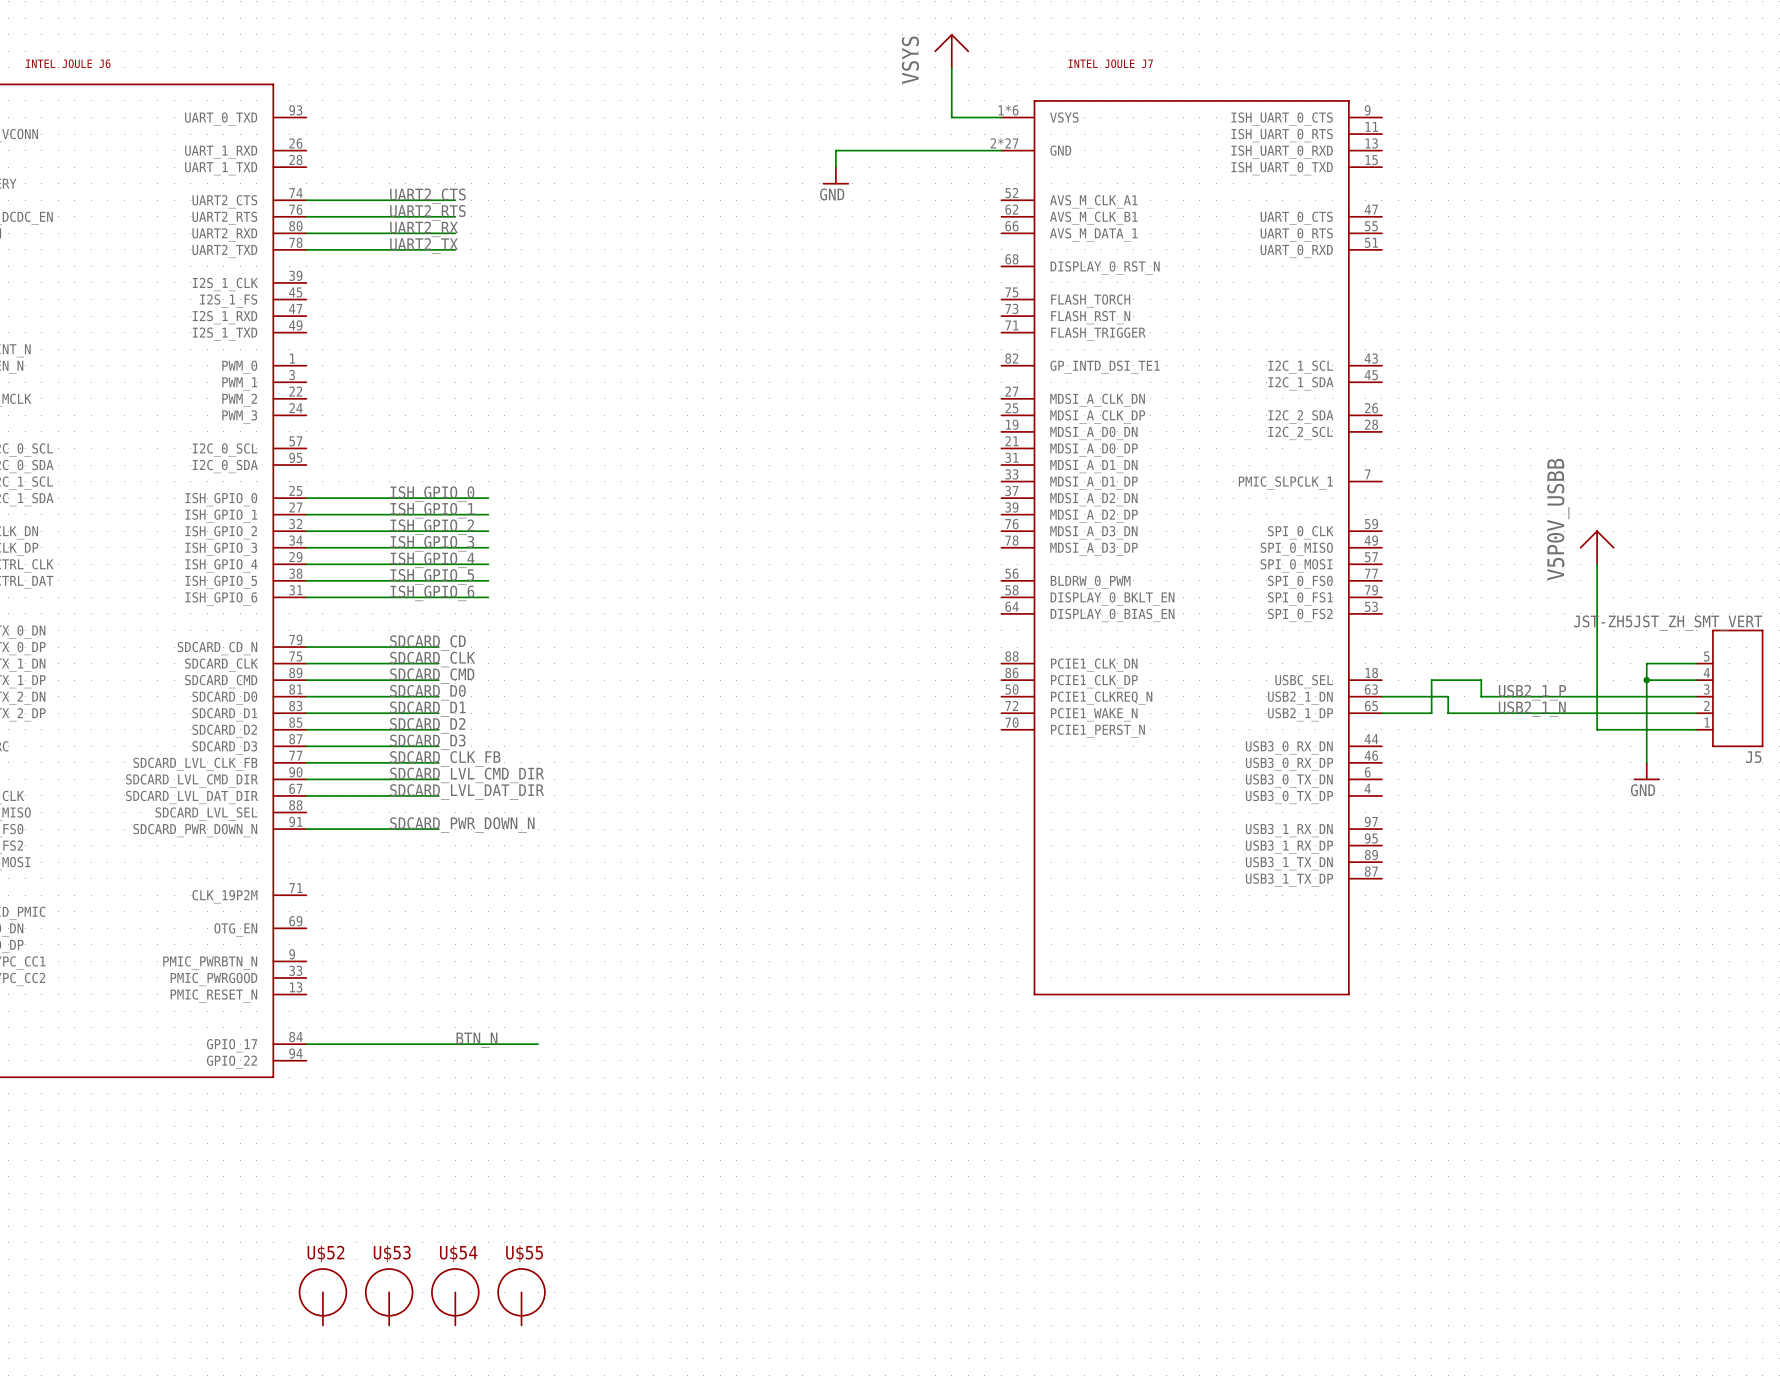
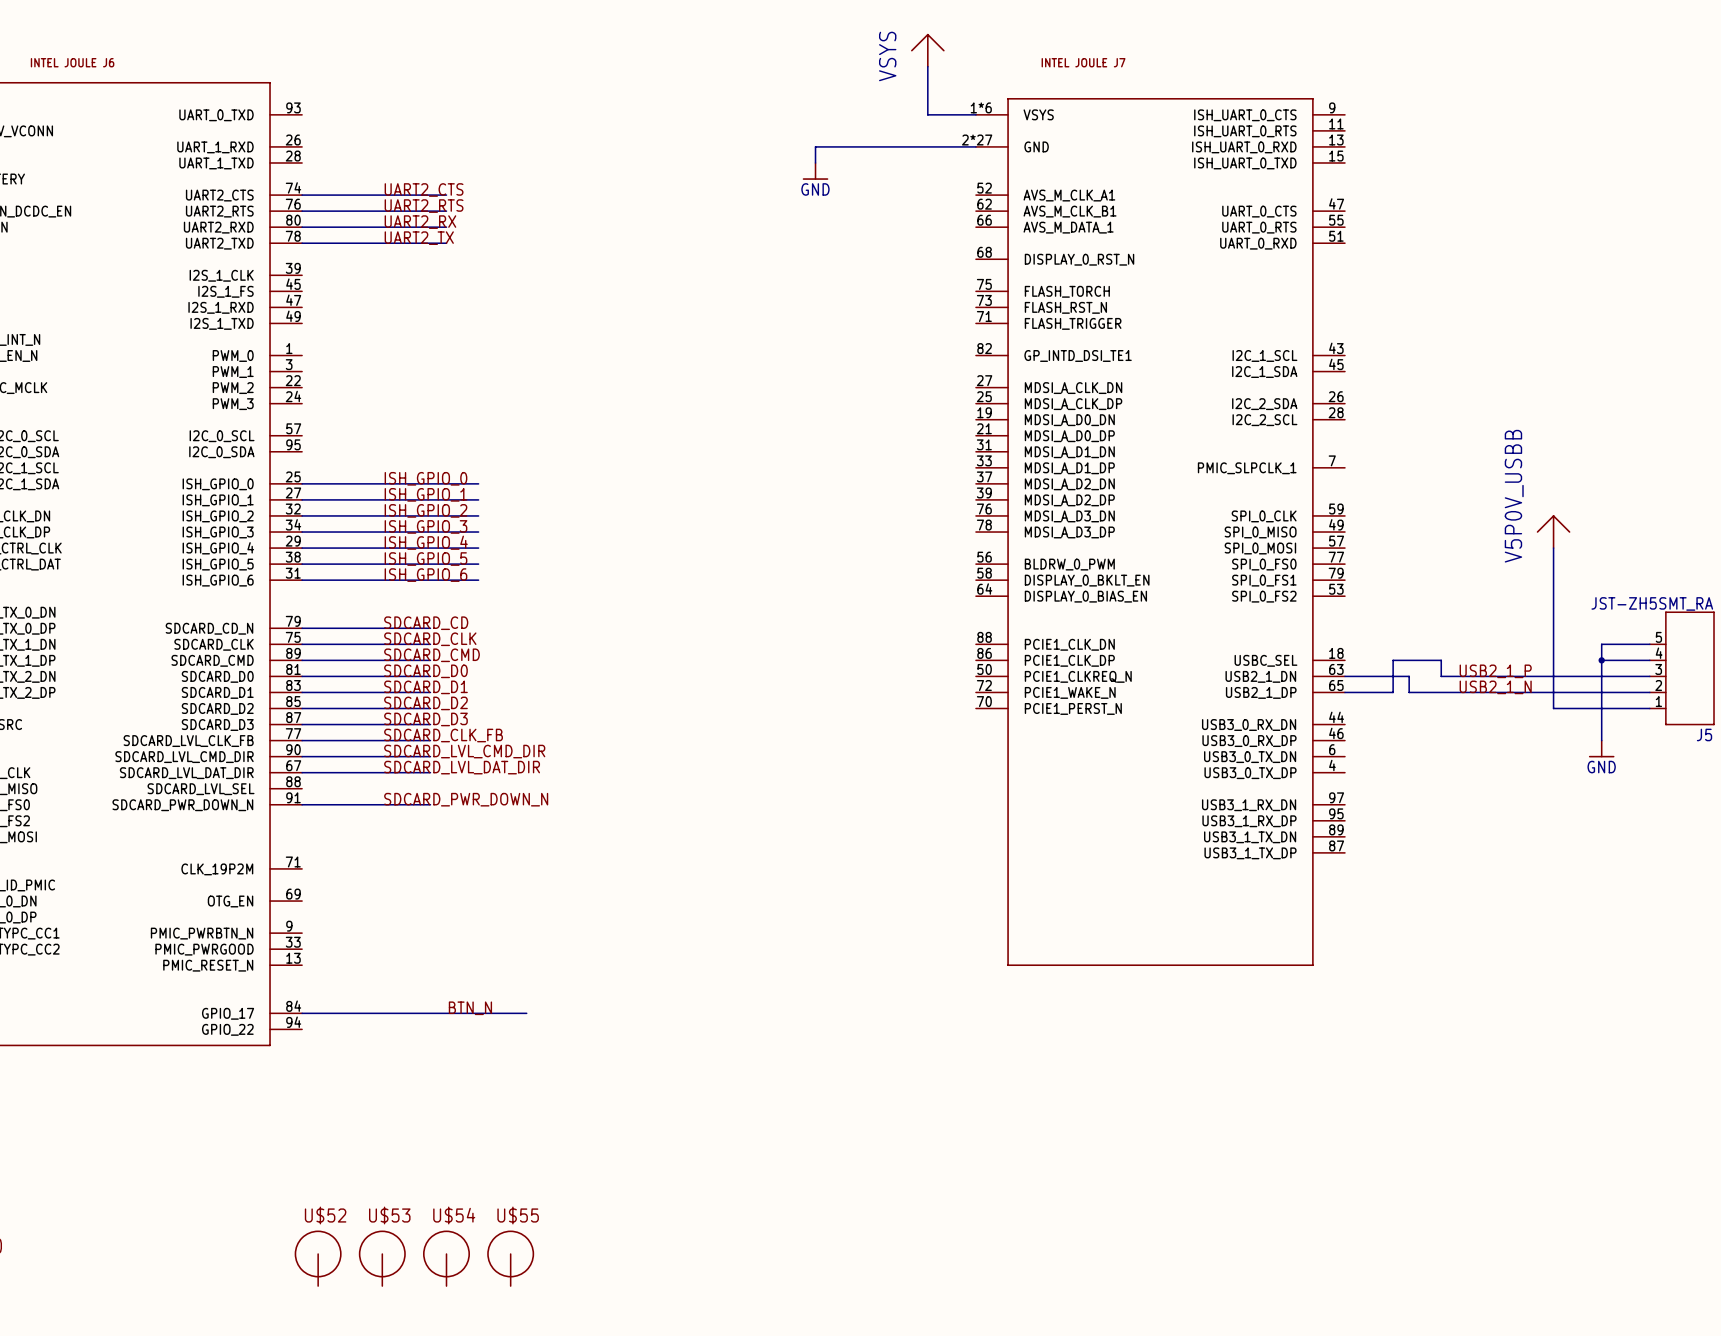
J5 value: JST-ZH5JST_ZH_SMT_VERT (1668, 623) -> JST-ZH5SMT_RA (1652, 603)

